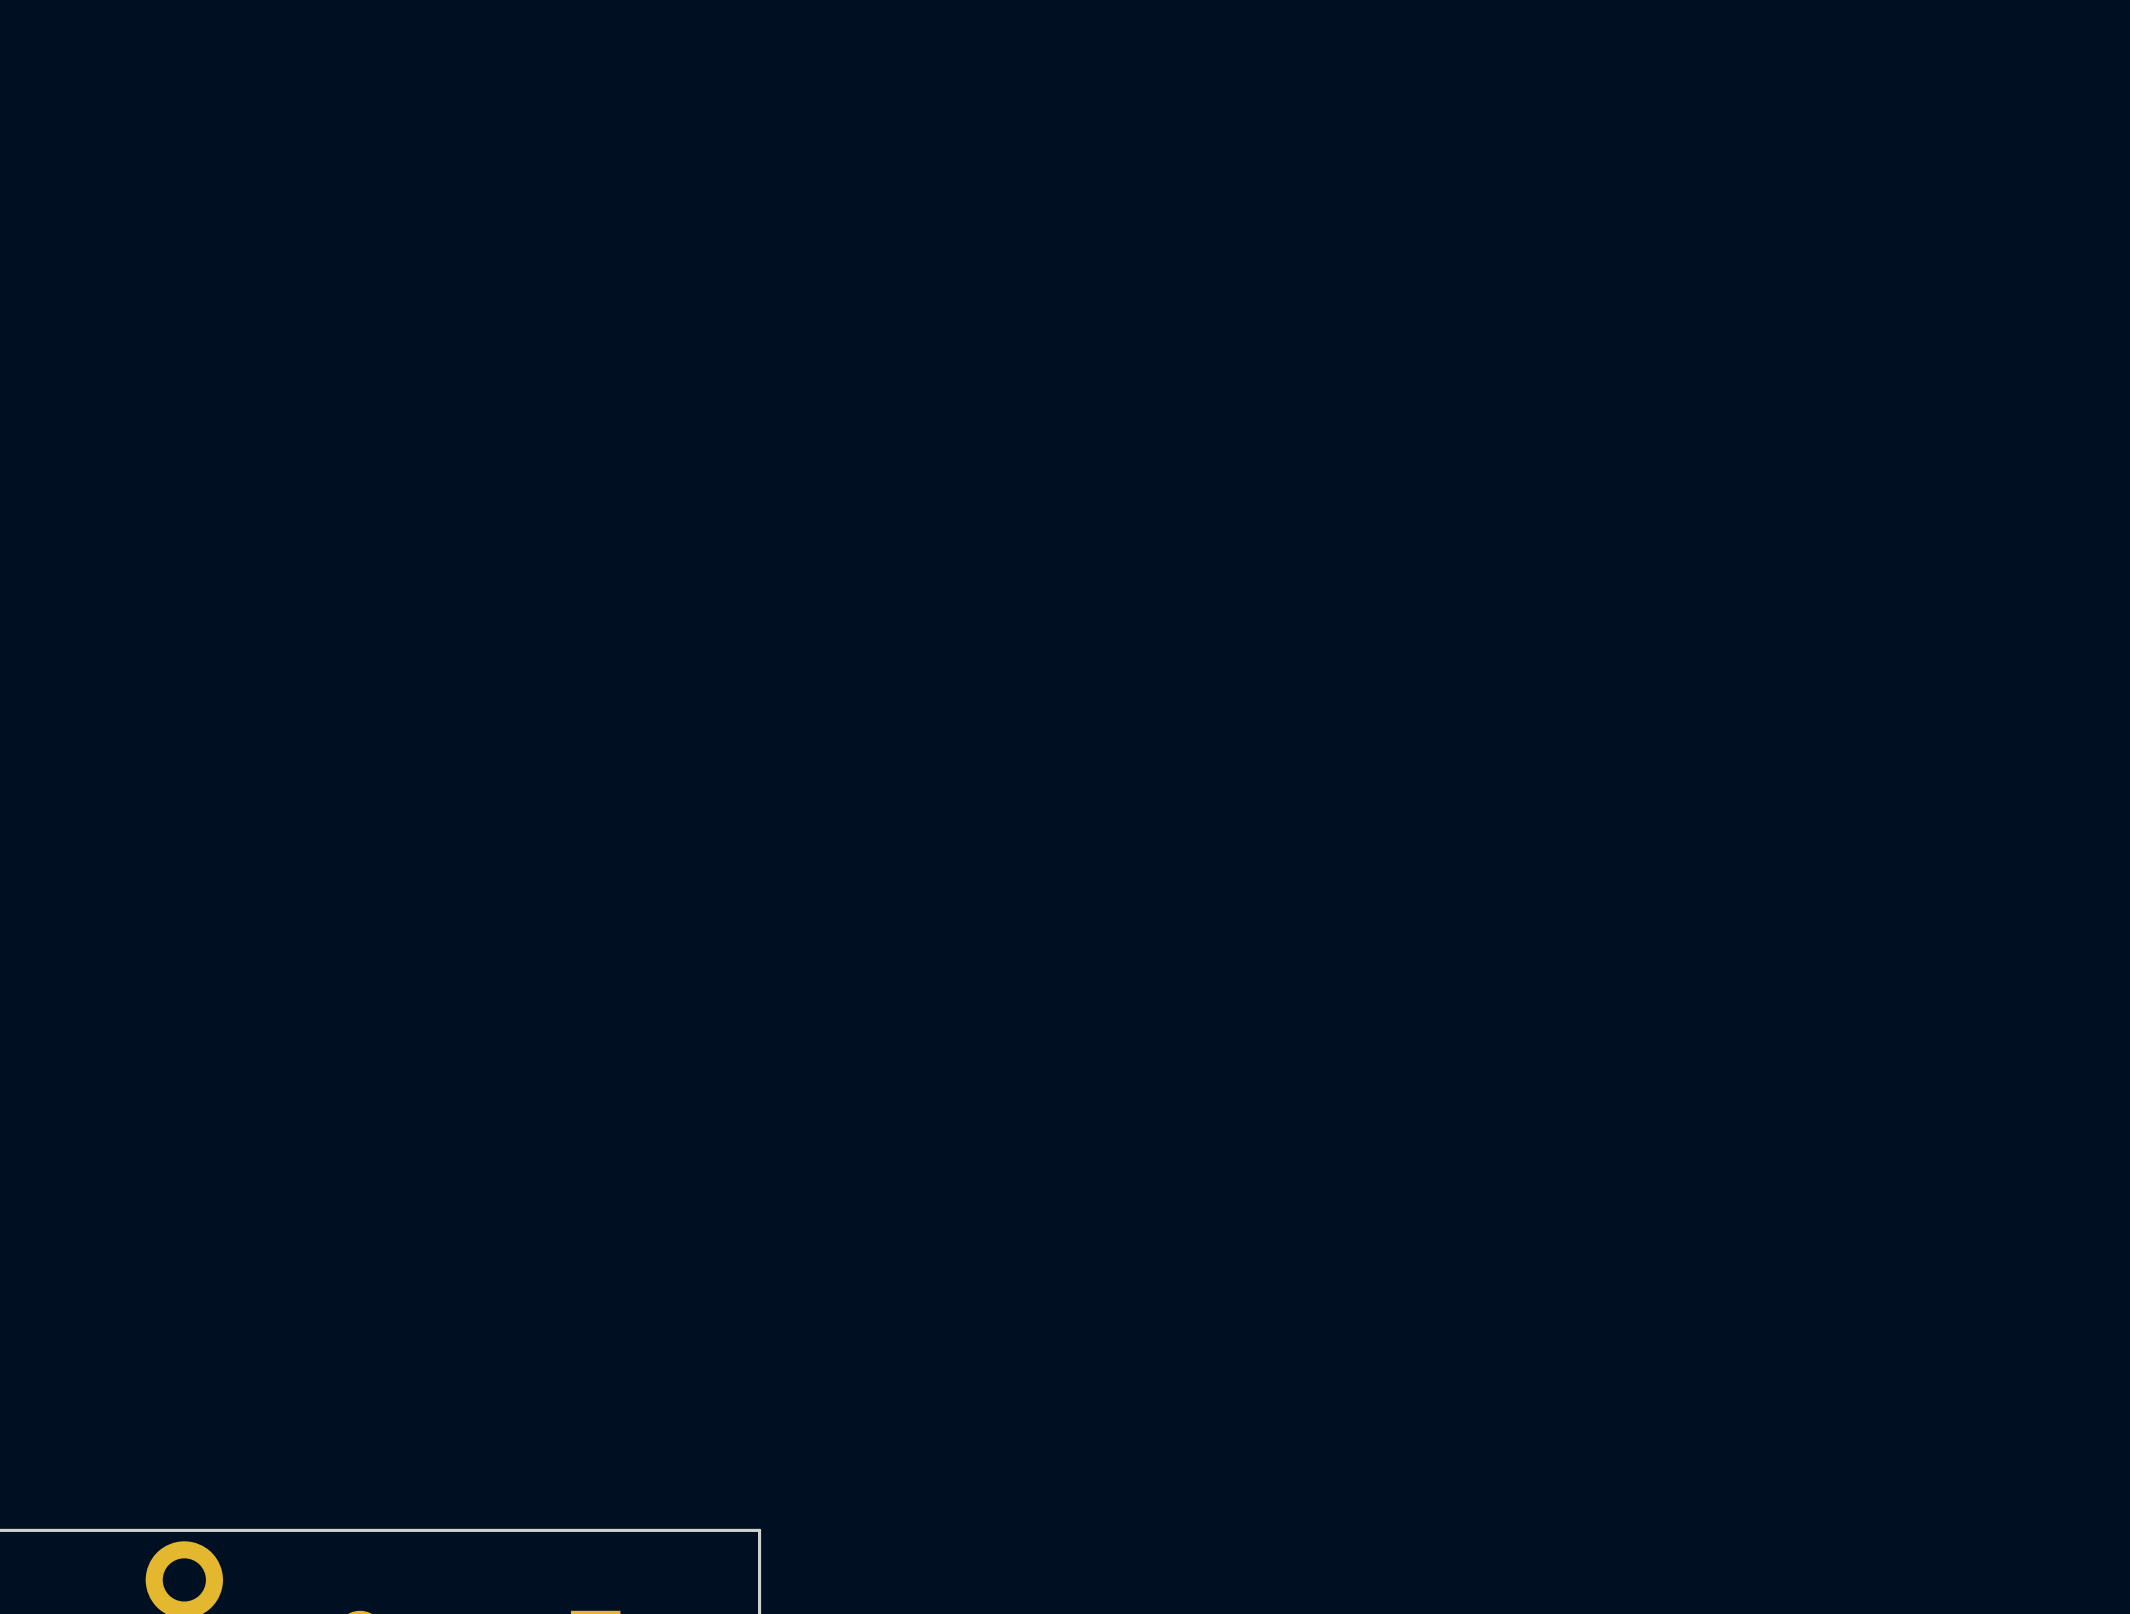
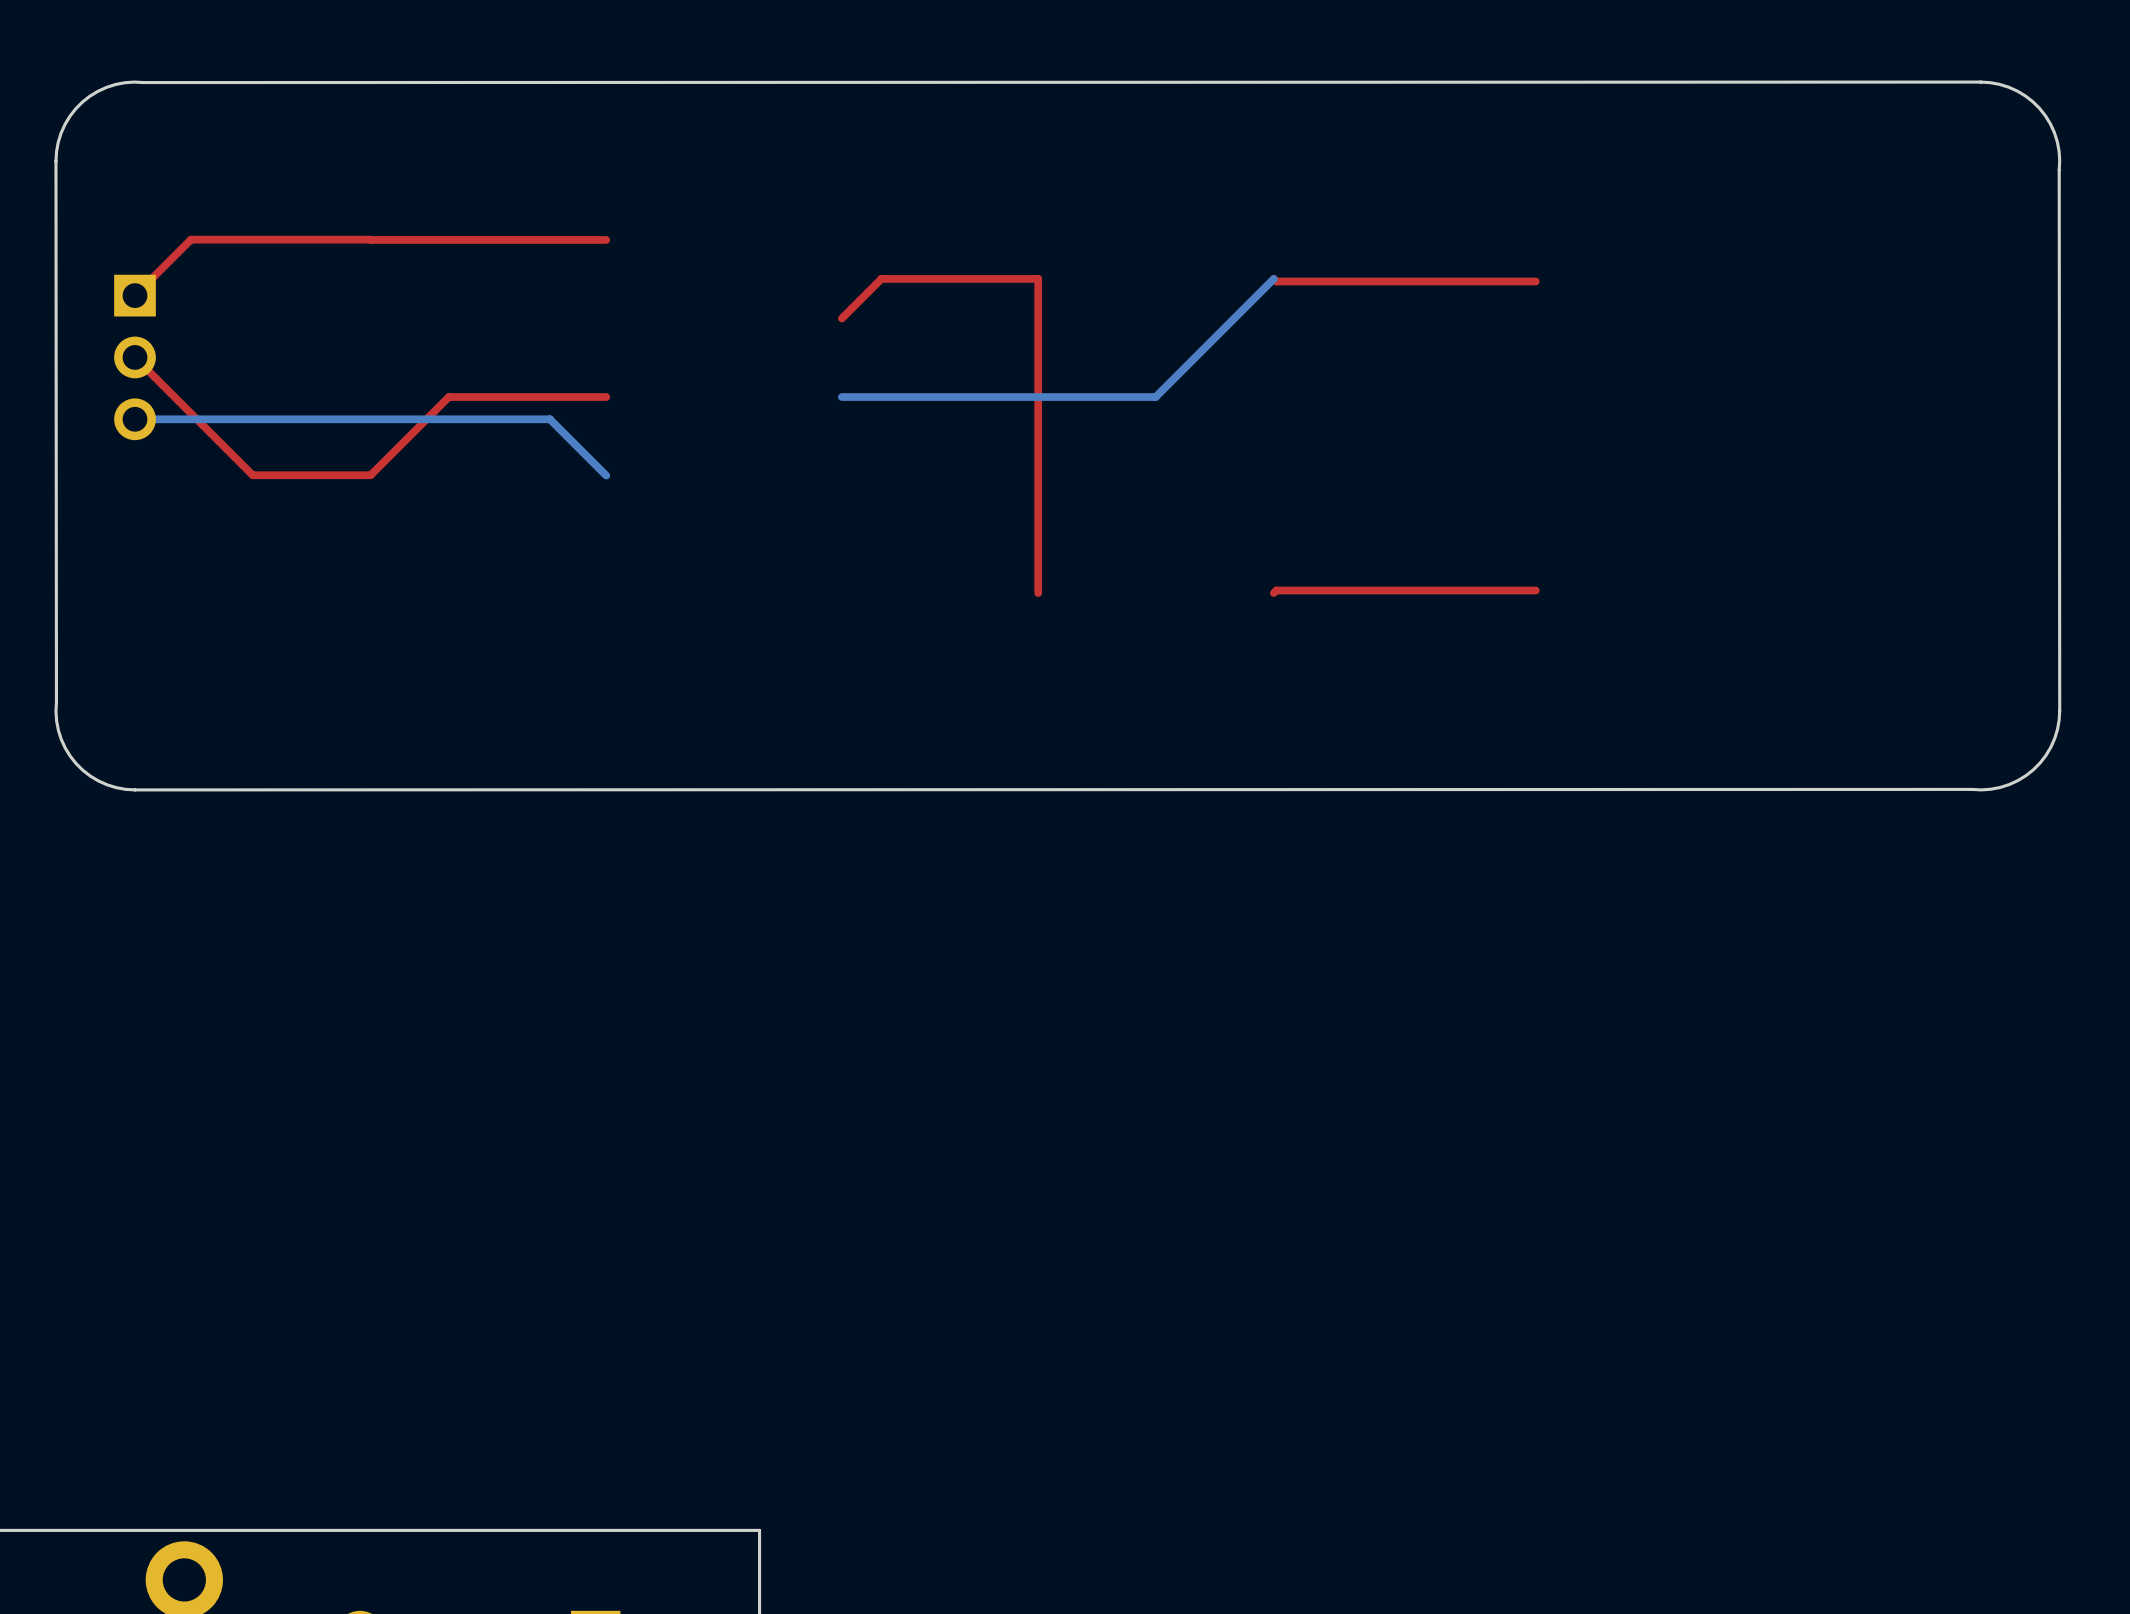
board edge: none -> (1980, 82) (134, 82) (106, 87) (89, 96) (69, 116) (61, 133) (56, 151) (55, 711) (61, 739) (76, 763) (90, 776) (107, 784) (135, 789) (1981, 789) (2009, 784) (2025, 775) (2045, 755) (2054, 738) (2059, 720) (2059, 160) (2054, 132) (2039, 108) (2017, 91) (1999, 84) (1980, 82)
top track: none -> (370, 239) (190, 239) (135, 295)
top track: none -> (606, 239) (370, 239)
bottom track: none -> (1273, 278) (1155, 397) (841, 397)
top track: none -> (1273, 278) (1276, 281) (1535, 281)
top track: none -> (841, 318) (881, 278) (1038, 278) (1038, 593)
top track: none -> (135, 357) (252, 475) (370, 475) (448, 397) (606, 397)
part: none -> (135, 357)
bottom track: none -> (135, 419) (549, 419) (606, 475)
top track: none -> (1535, 590) (1276, 590) (1273, 593)

